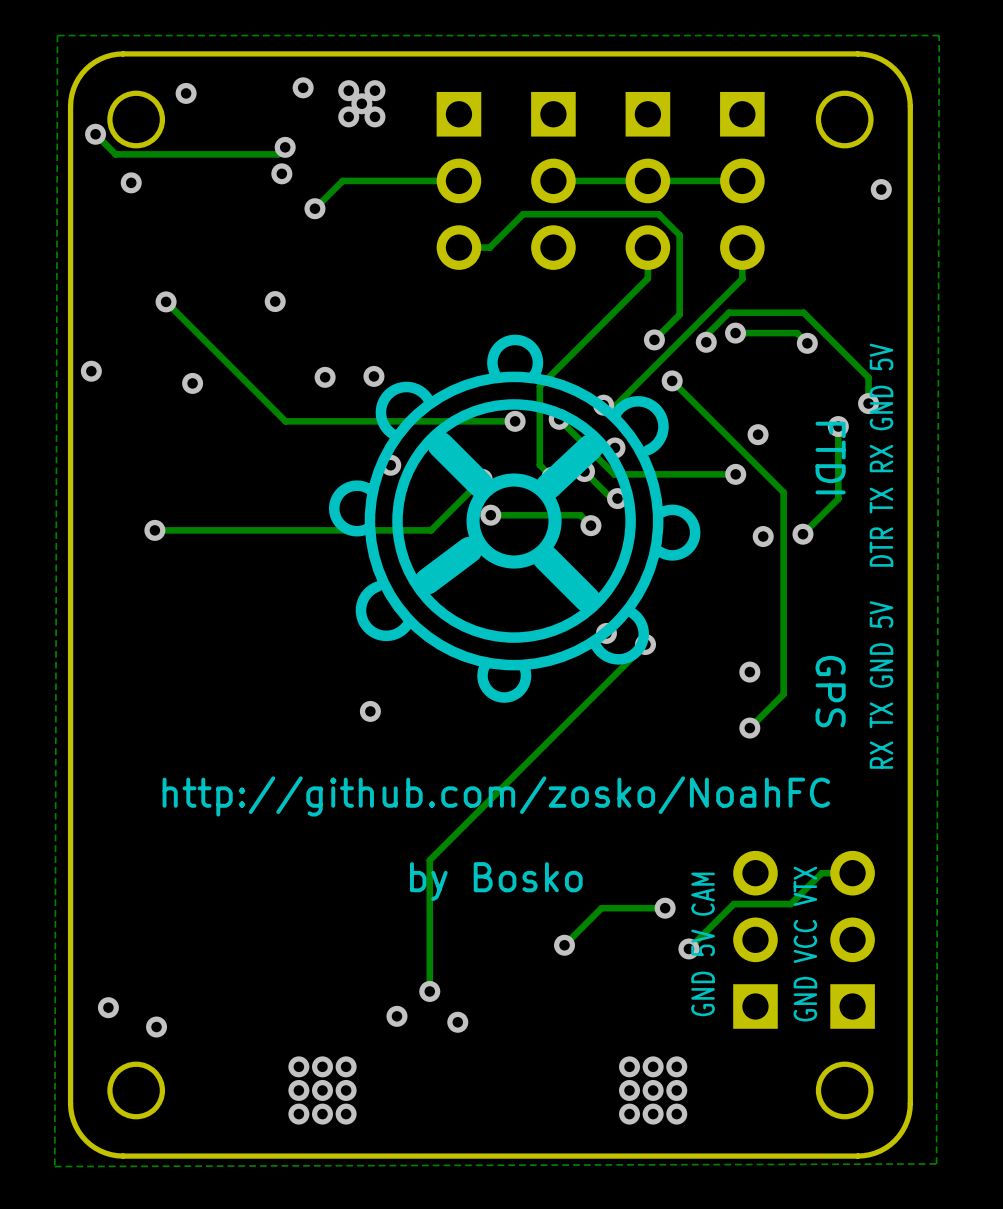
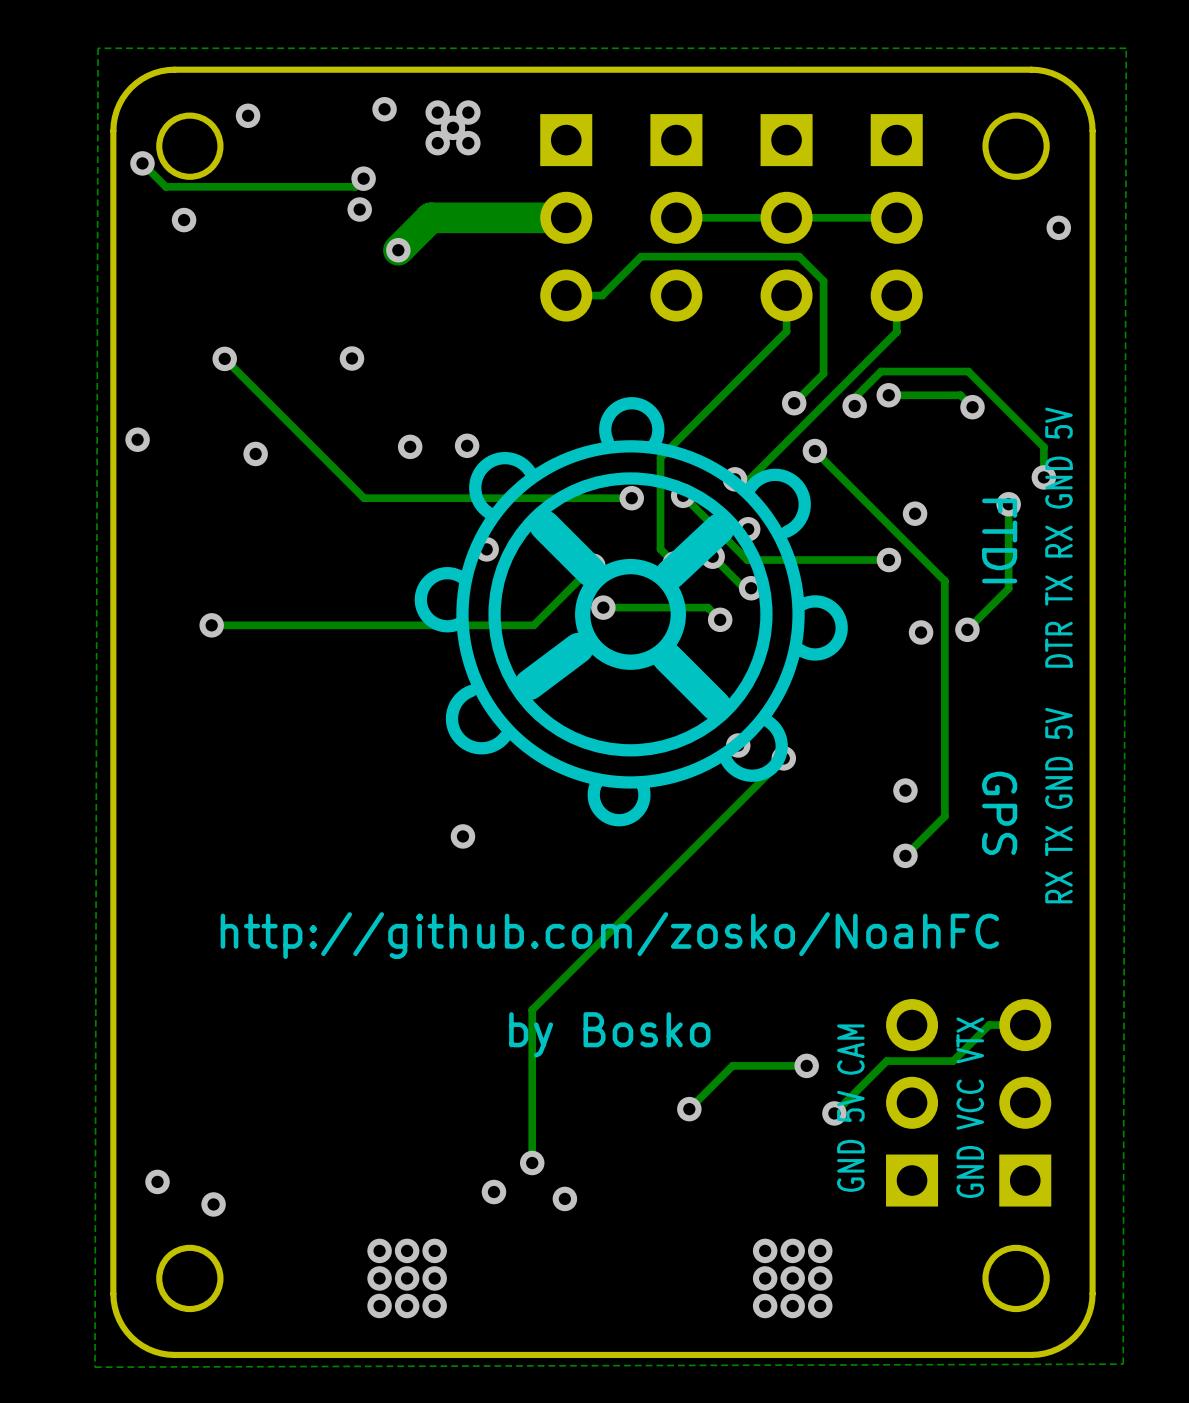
track width: thin (458, 180) (342, 180) (314, 208) -> thick (566, 217) (430, 217) (398, 250)

